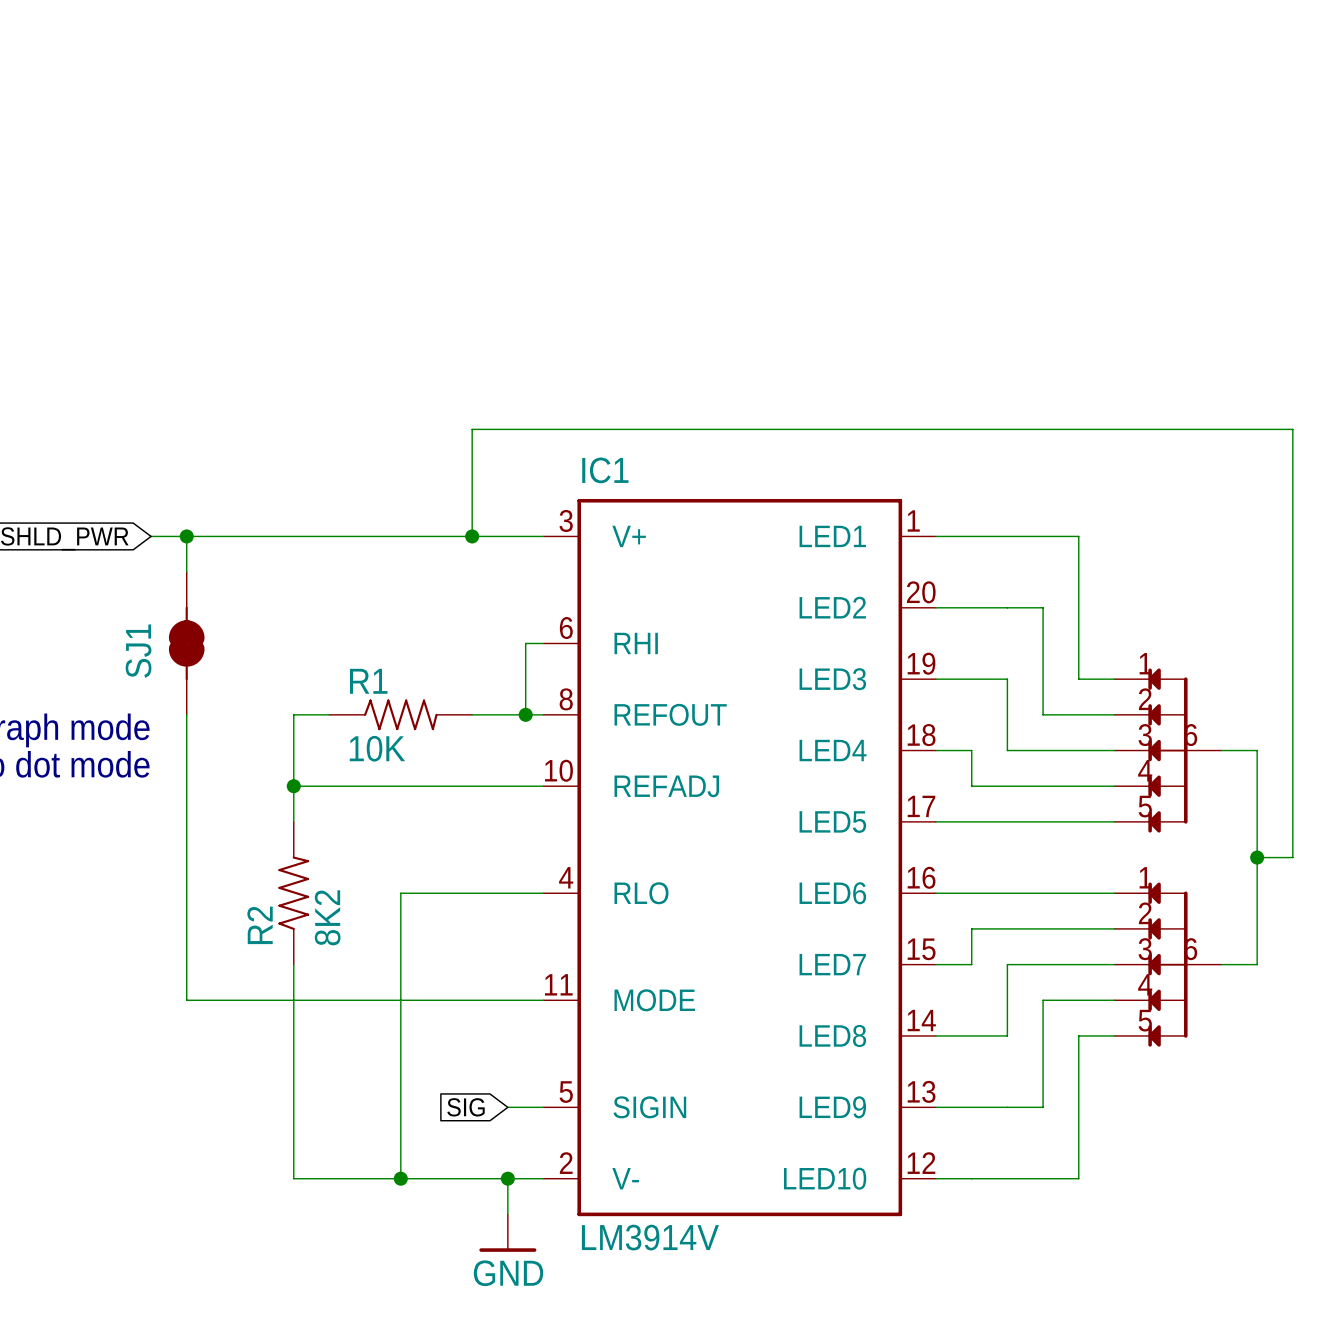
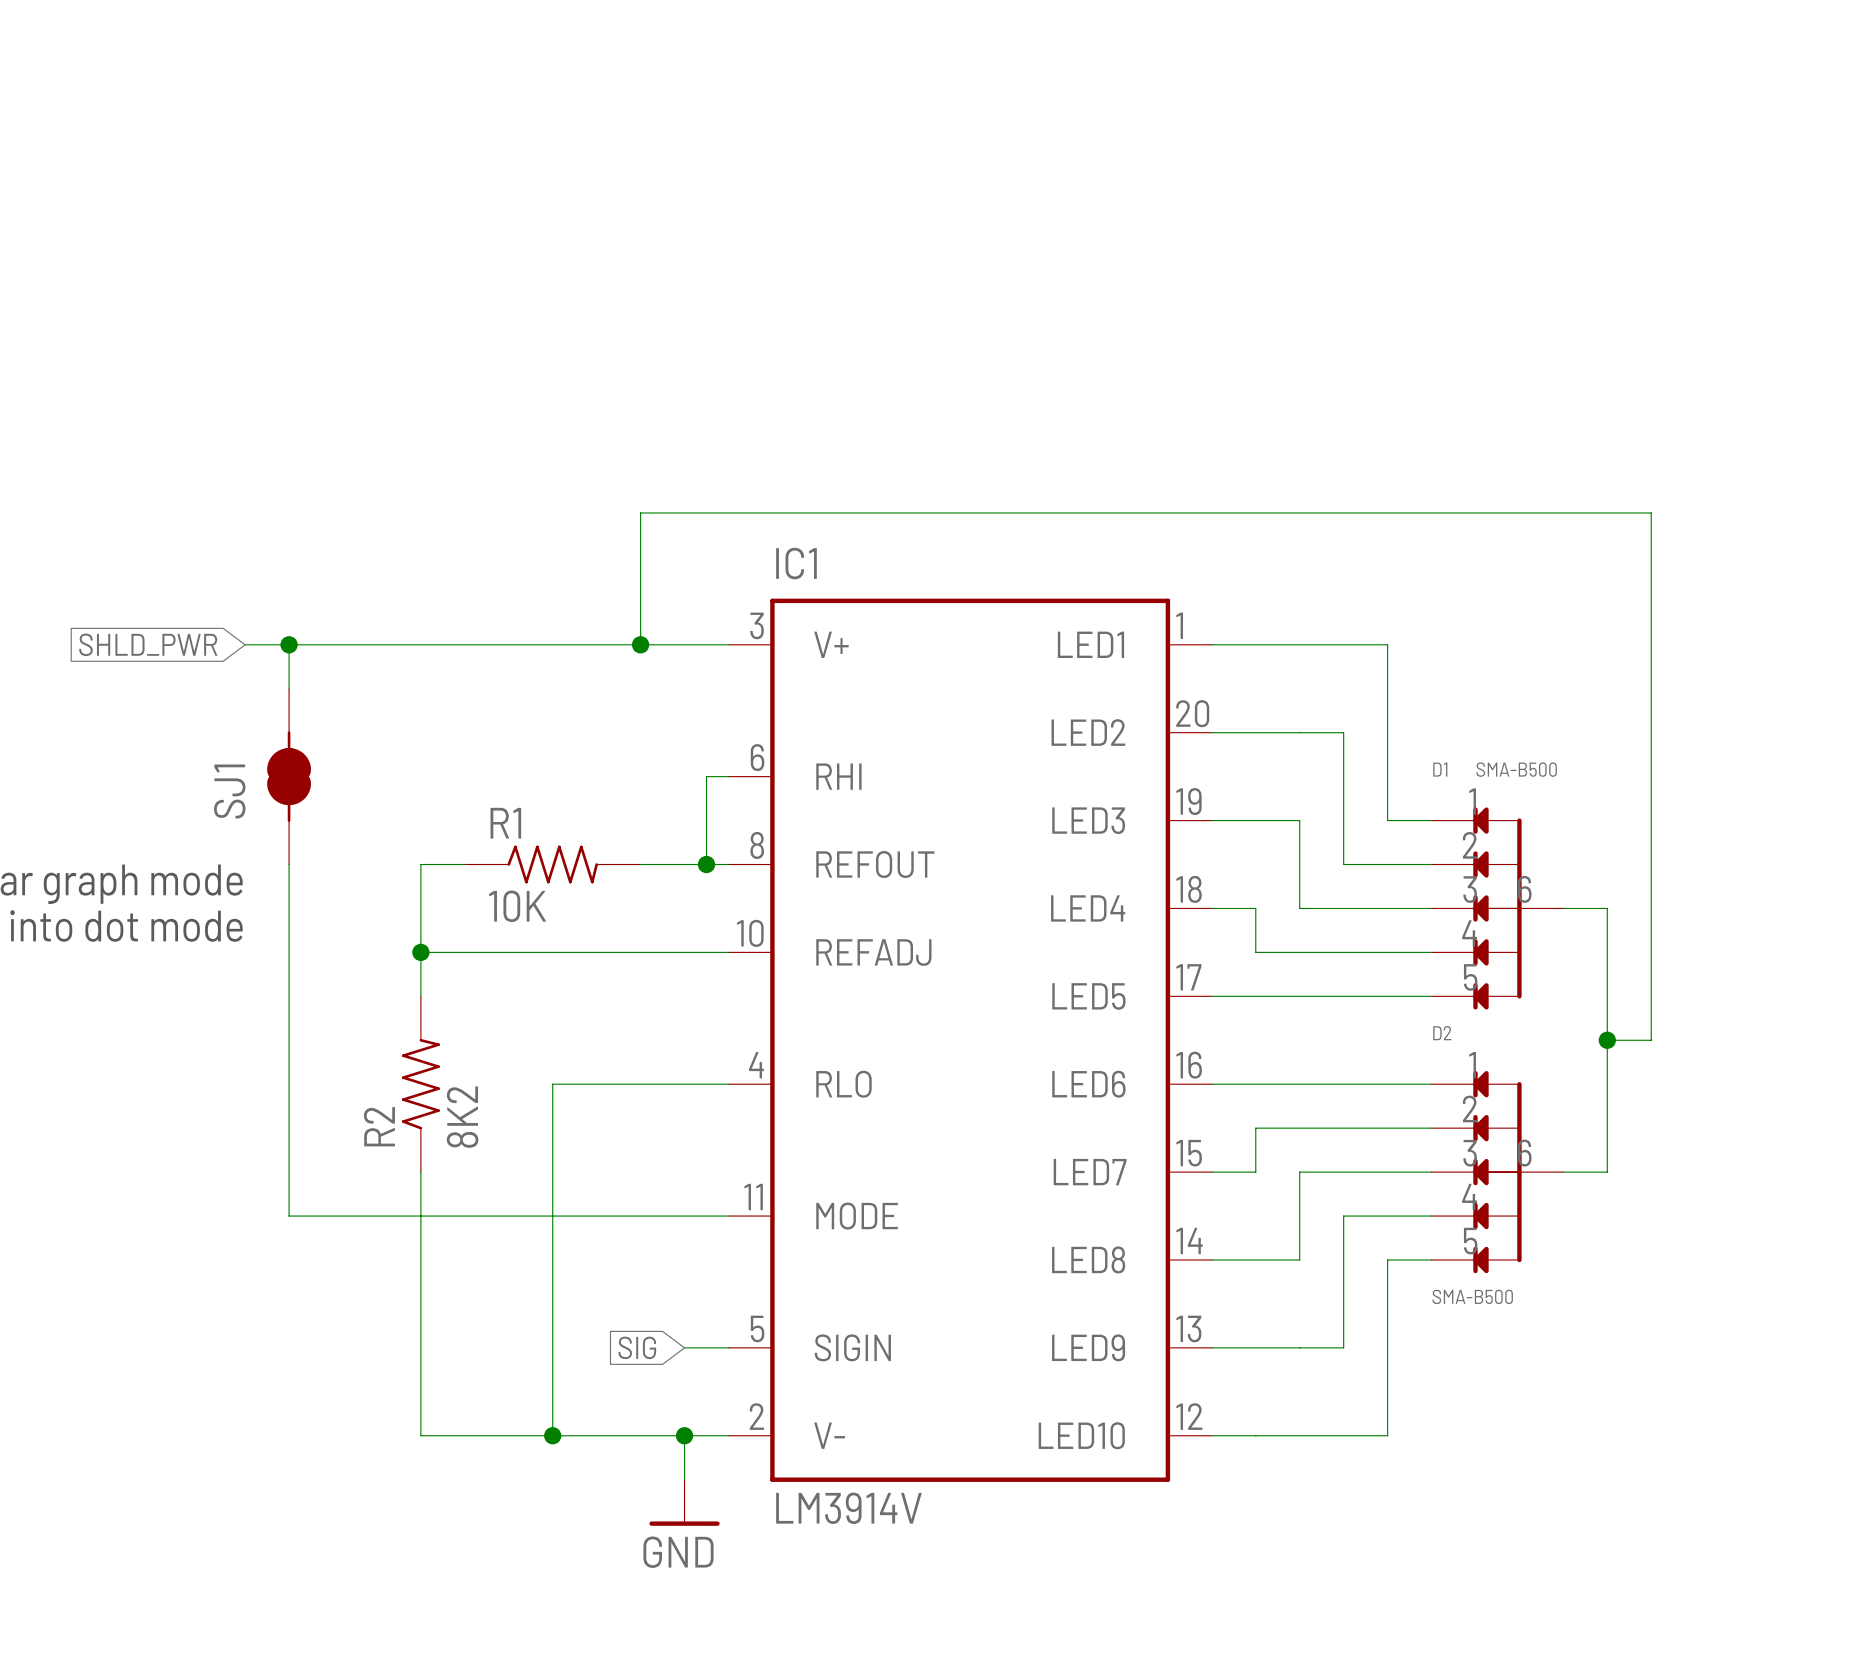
D1 name: none -> D1 (1440, 769)
D1 value: none -> SMA-B500 (1516, 769)
D2 name: none -> D2 (1442, 1033)
D2 value: none -> SMA-B500 (1472, 1296)

